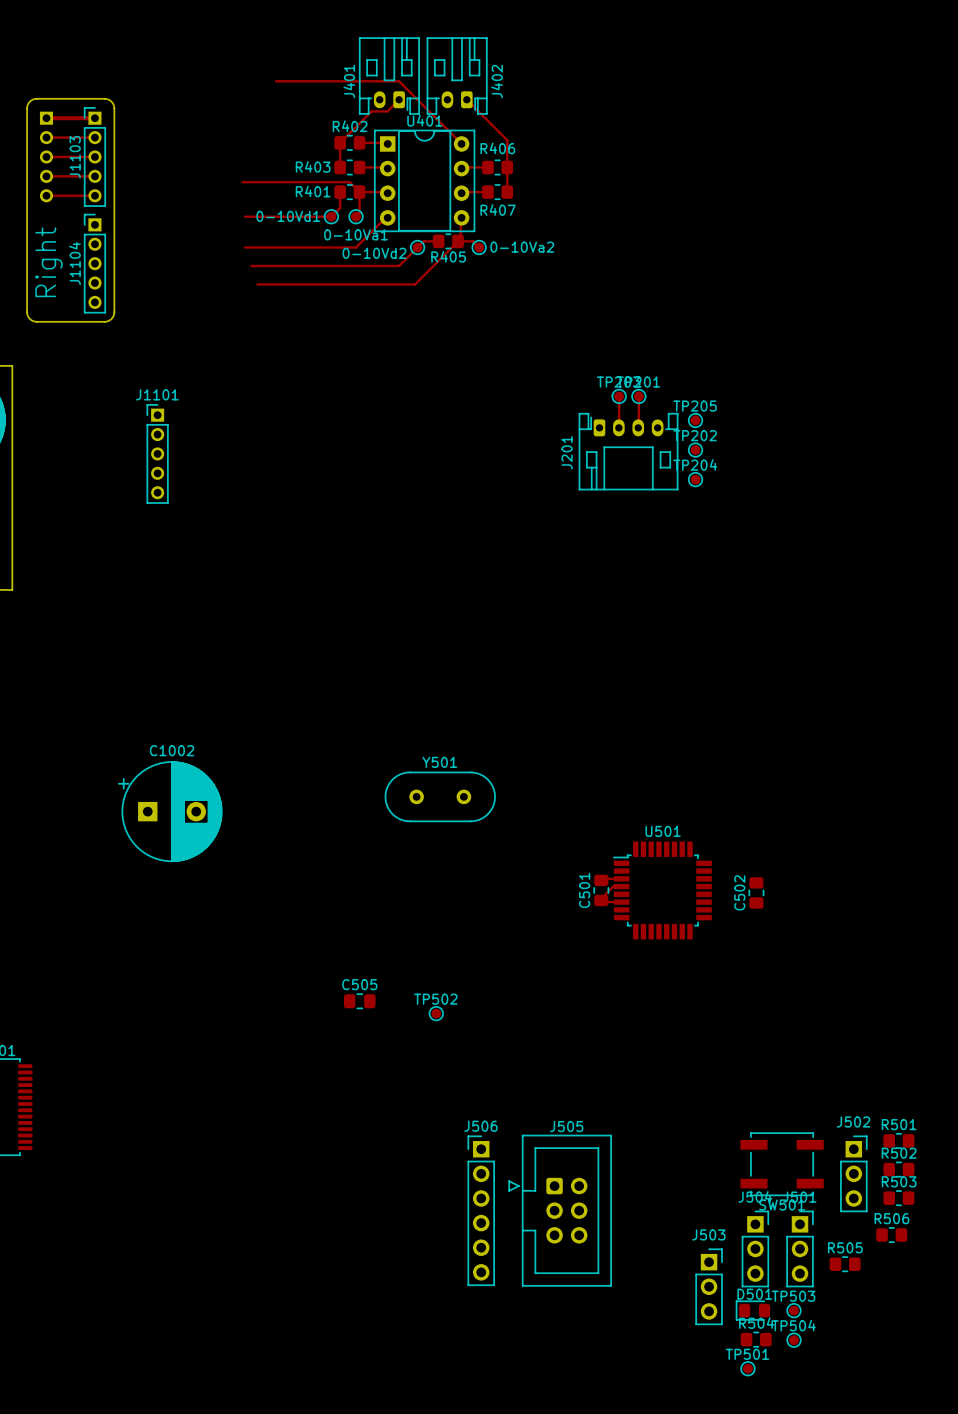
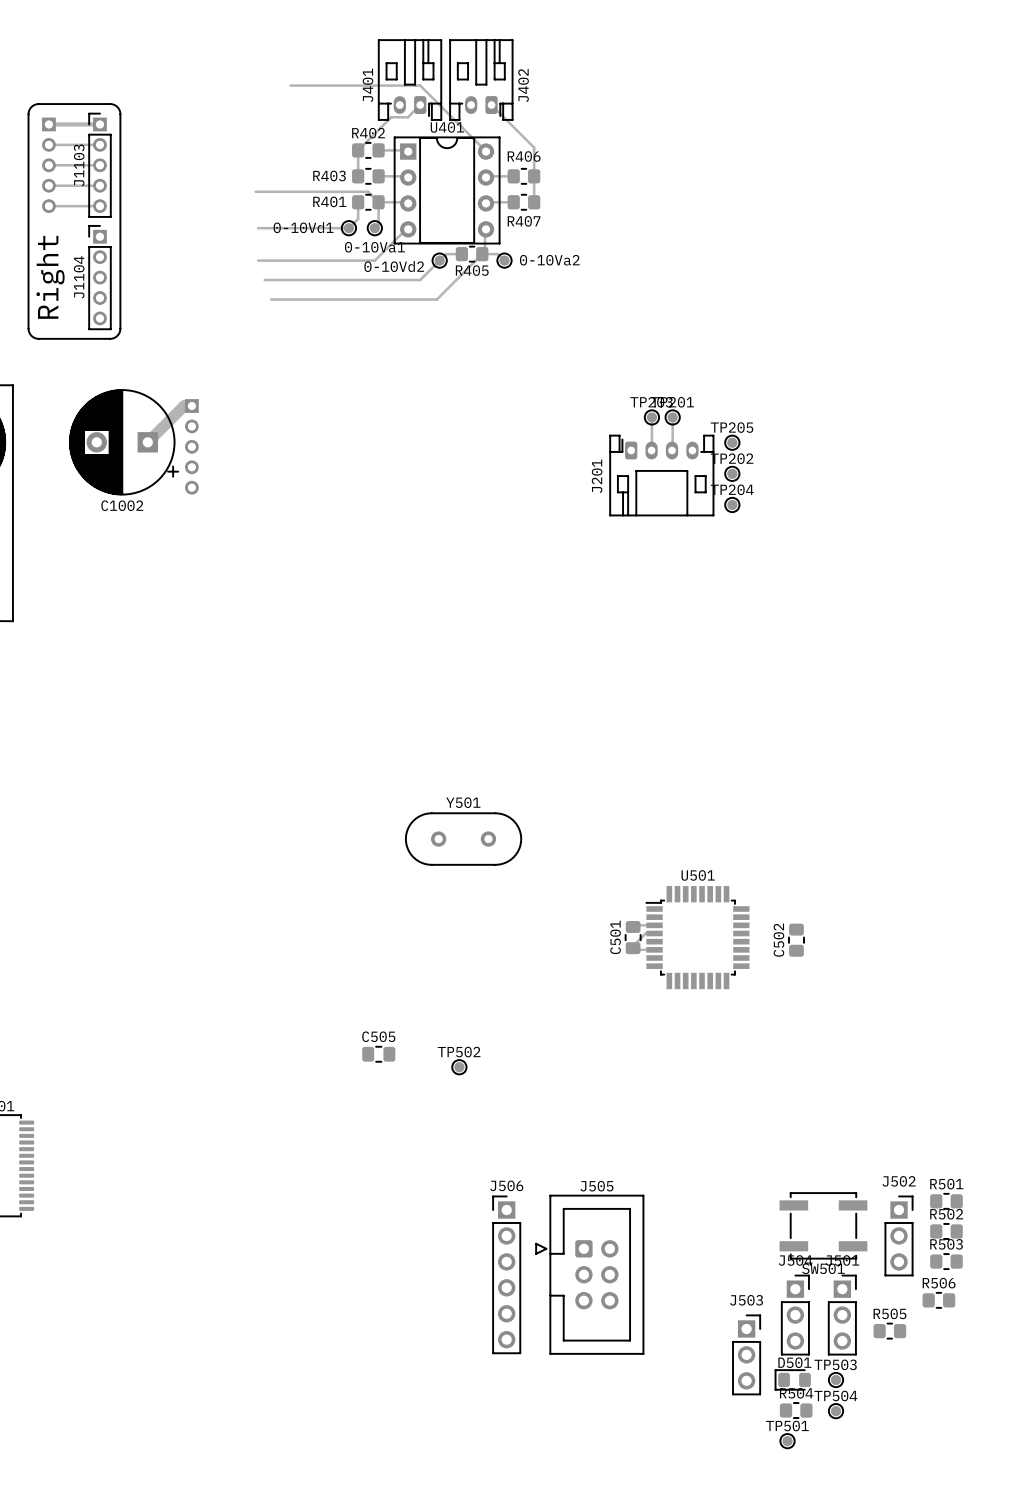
track: none -> (191, 406) (184, 406) (147, 442)
J1101 side: top (157, 453) -> bottom (191, 446)
C1002 rotation: 0° (170, 811) -> 180° (124, 442)
C1002 position: (170, 811) -> (124, 442)

